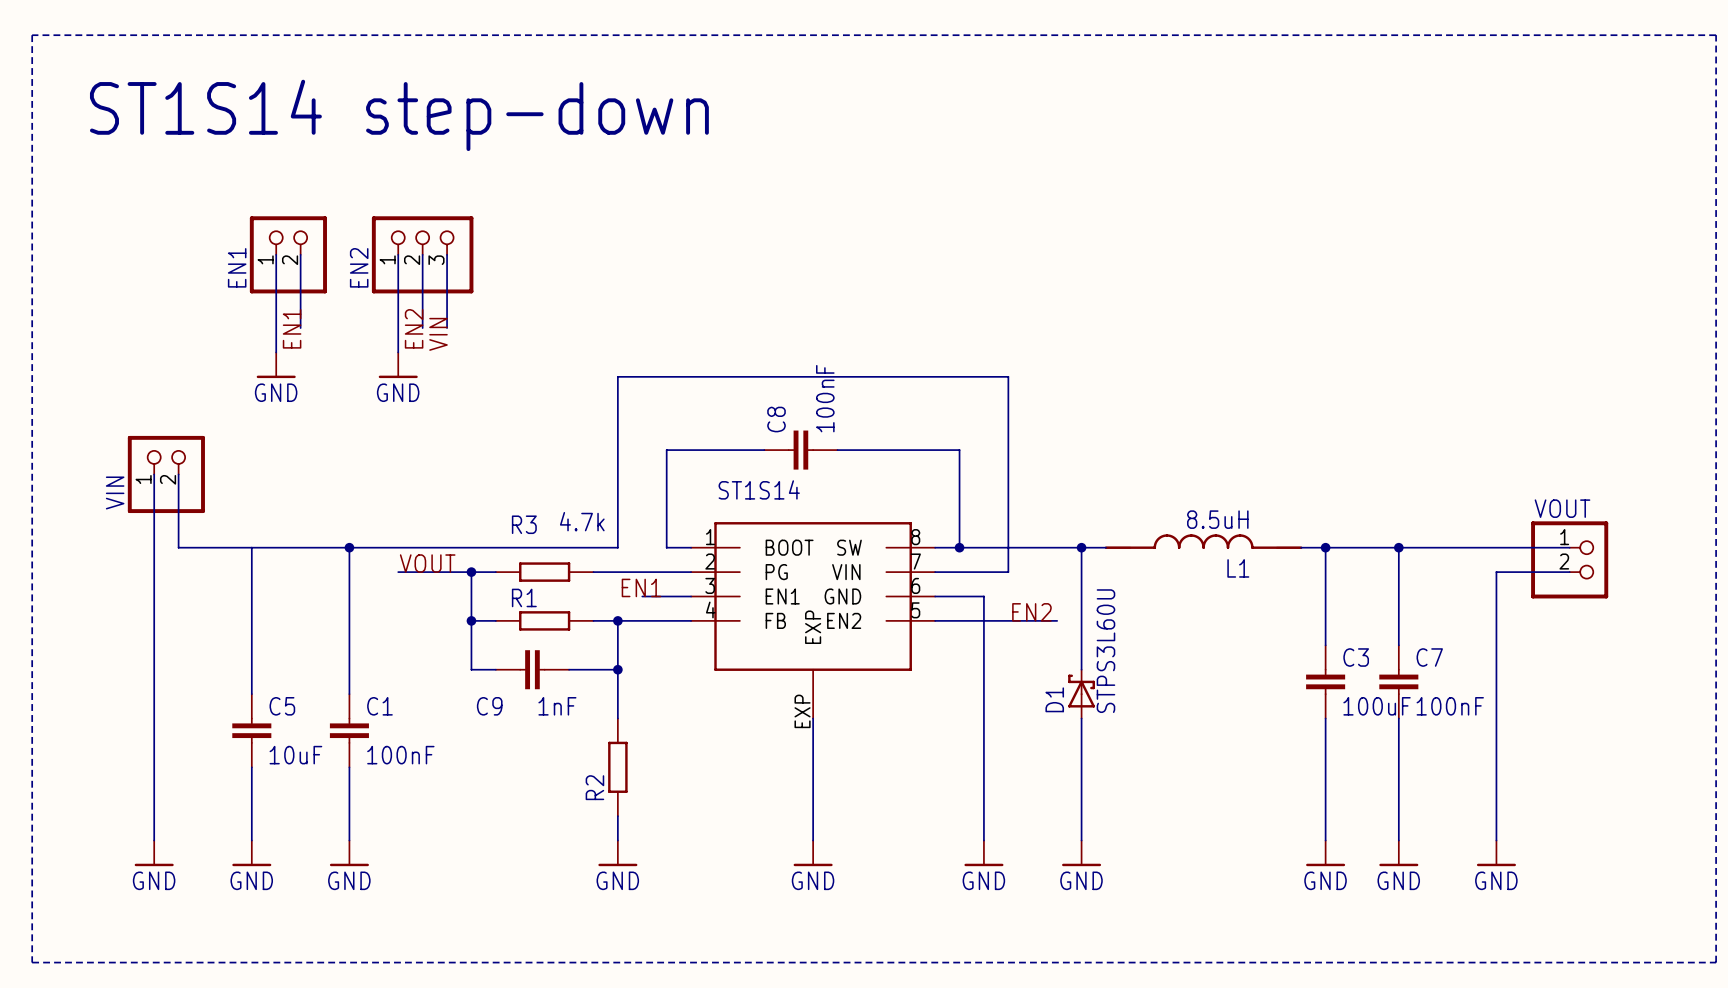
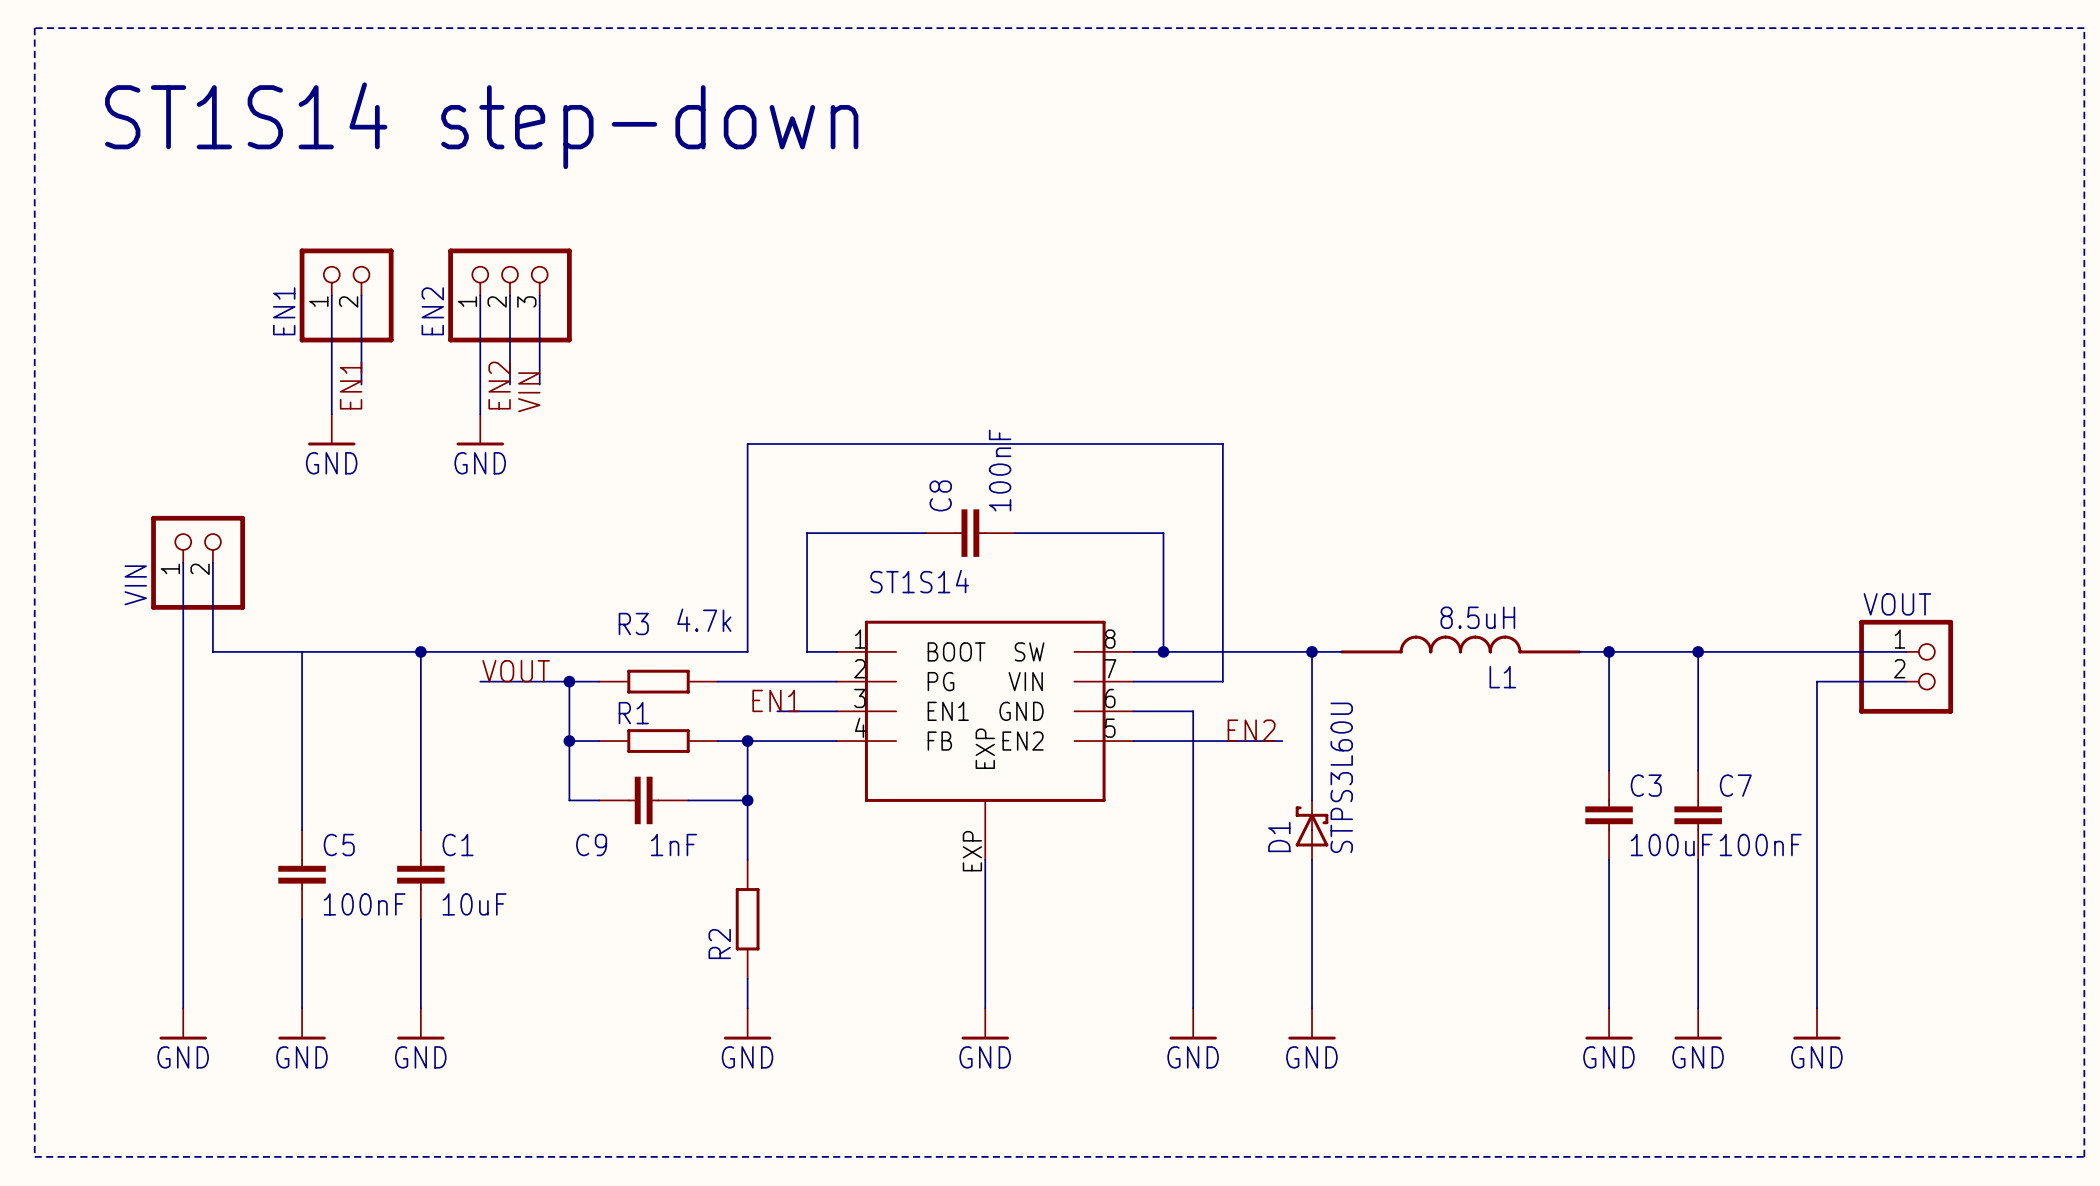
C5 value: 10uF (295, 755) -> 100nF (364, 904)
C1 value: 100nF (400, 755) -> 10uF (474, 904)

